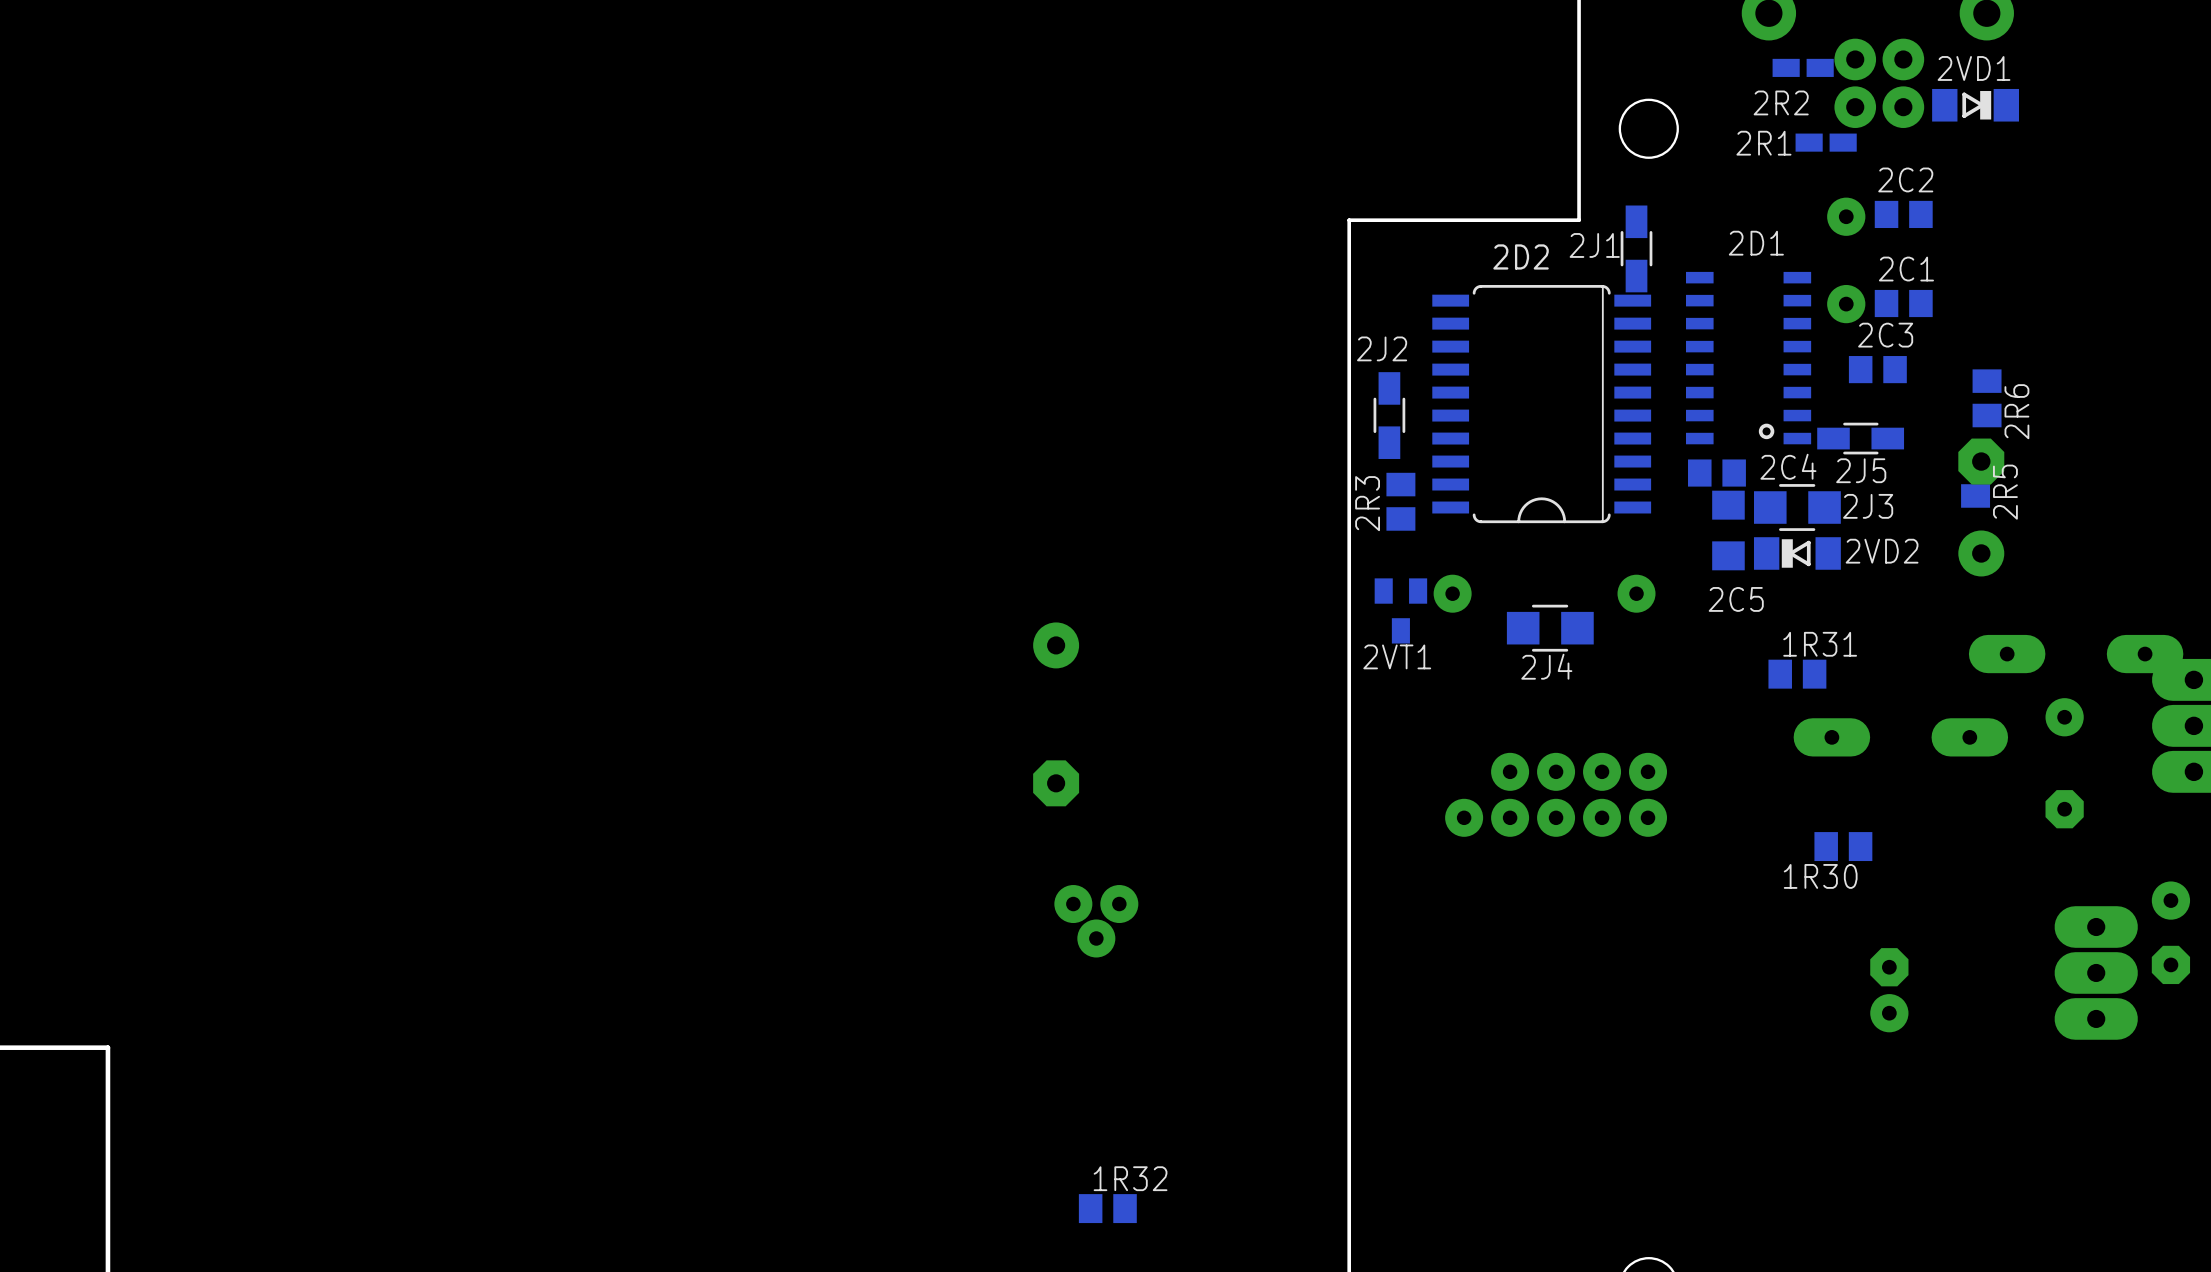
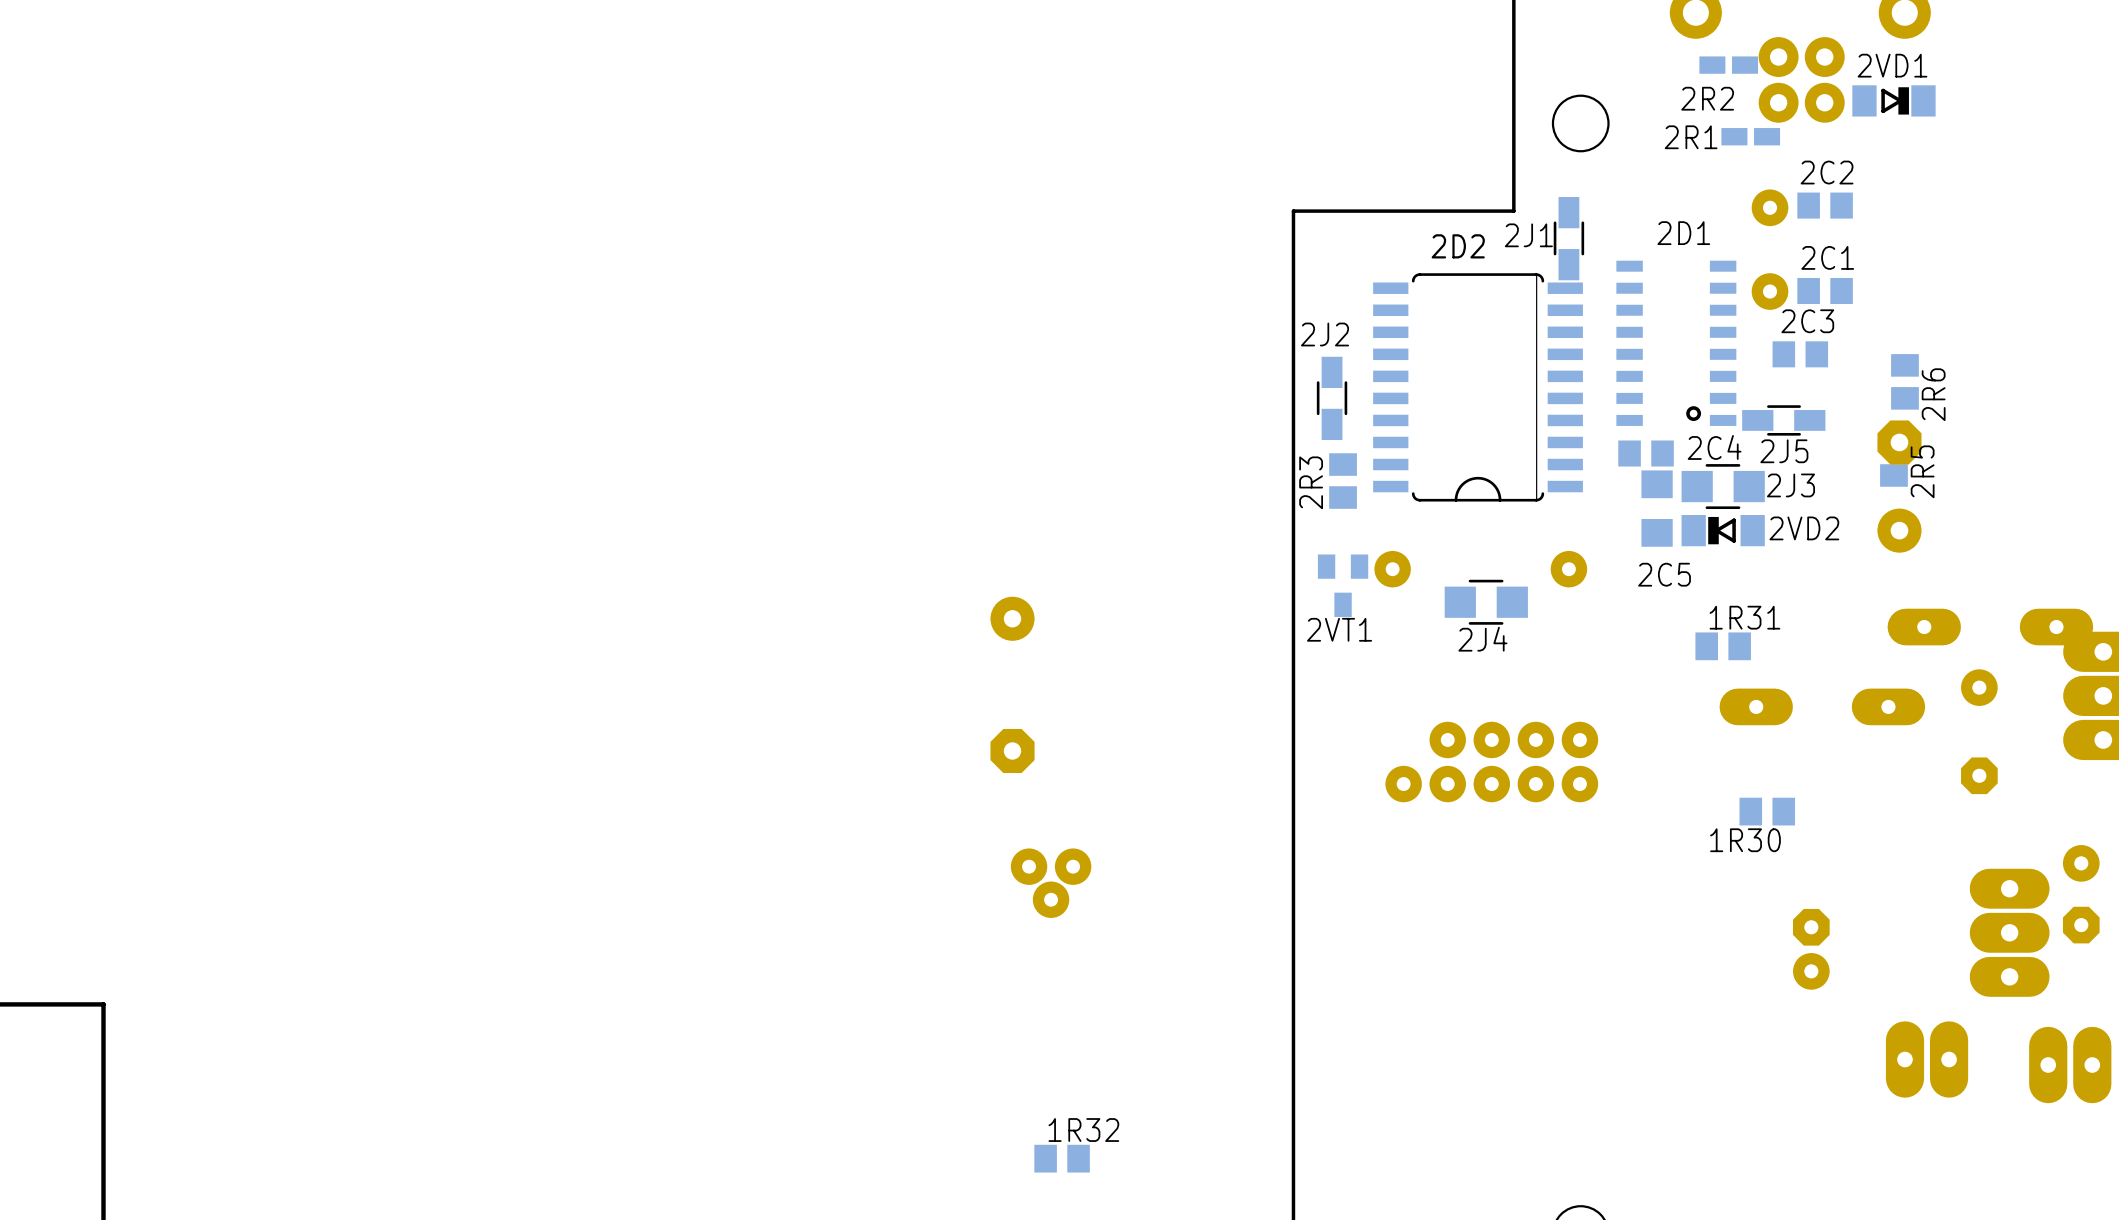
part: none -> (1927, 1059)
part: none -> (2070, 1065)

